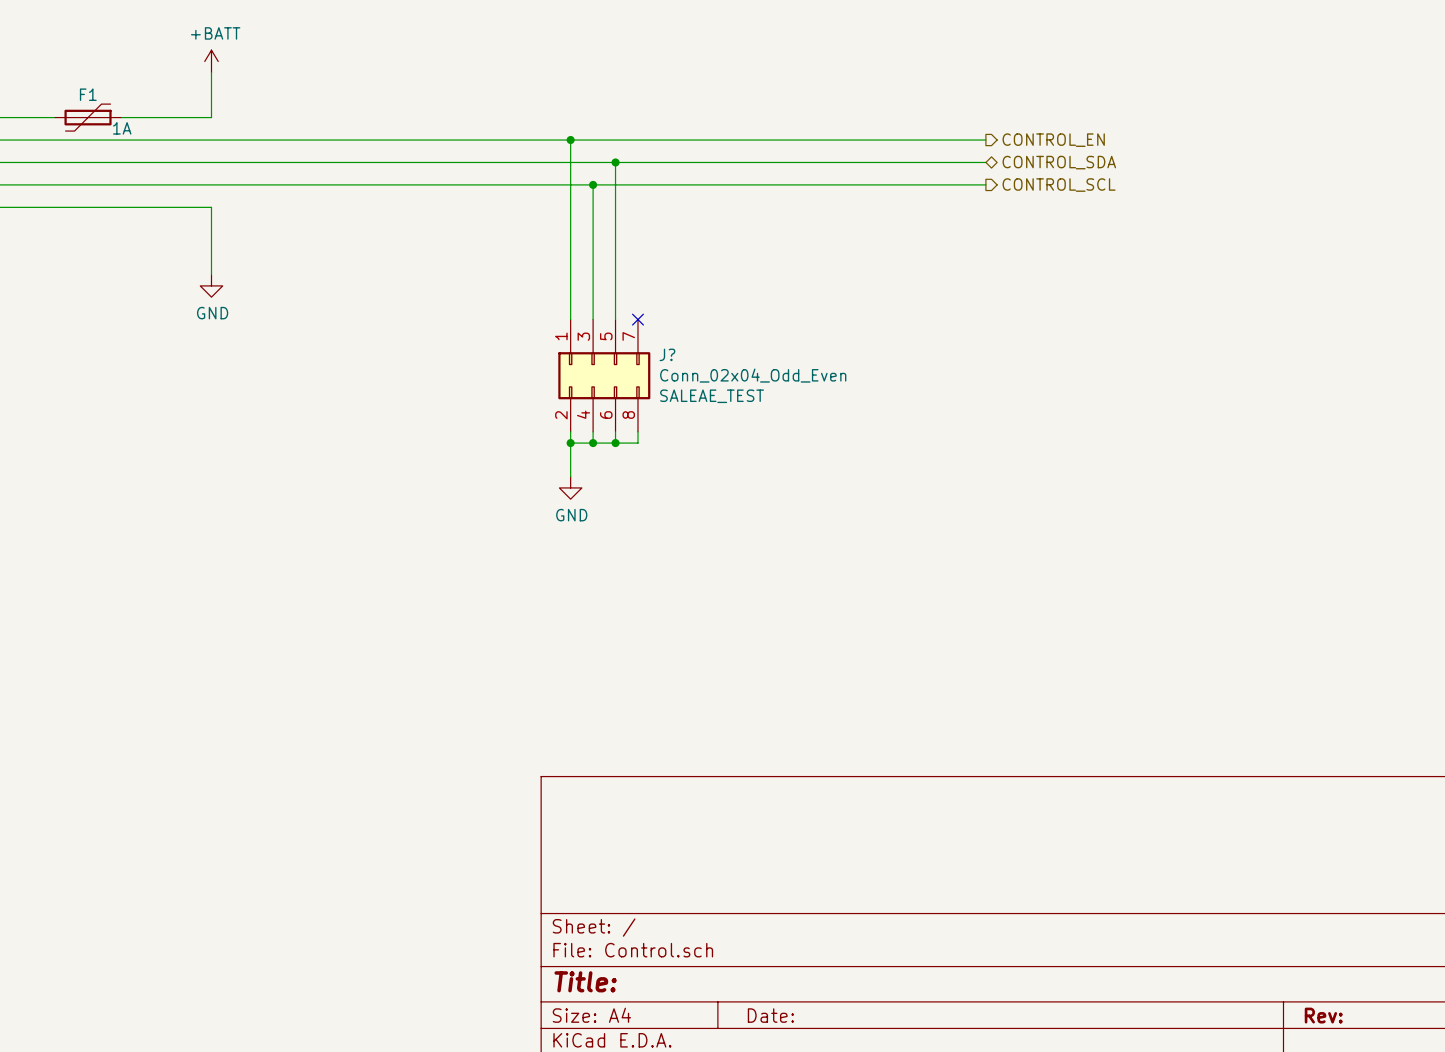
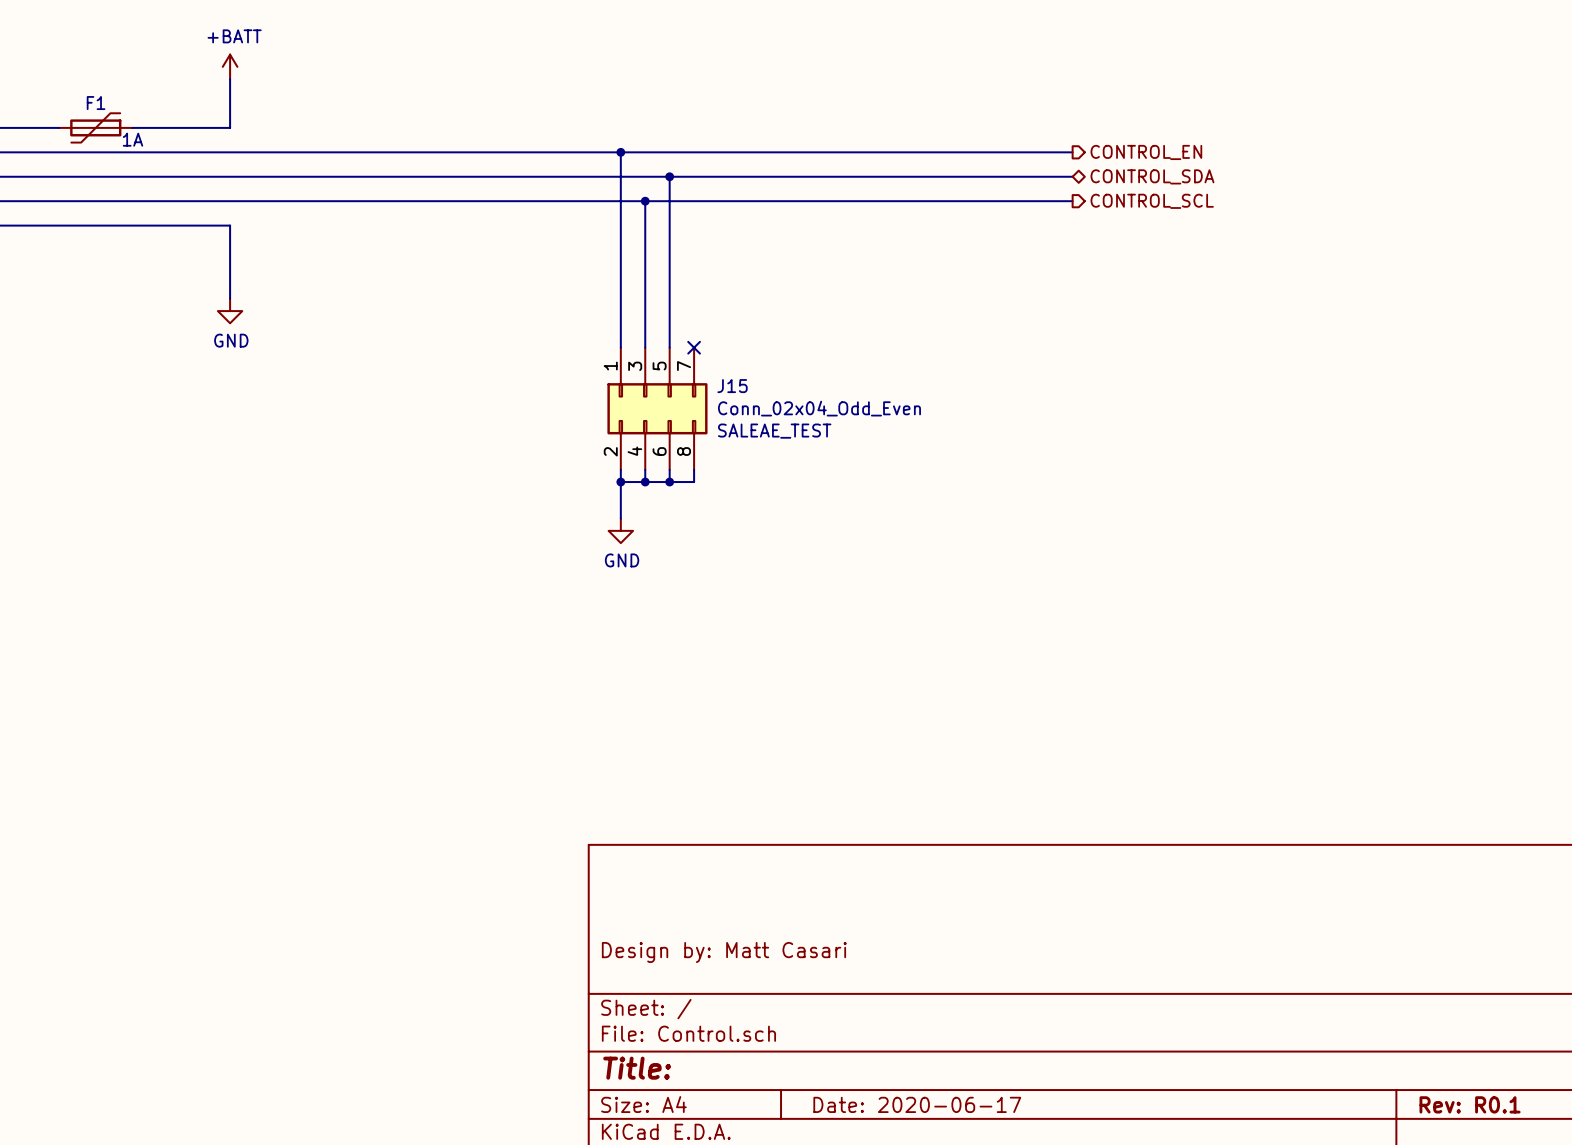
J? name: J? (667, 354) -> J15 (732, 386)
title block: none -> Design by: Matt Casari (724, 952)
title block: Date: (770, 1015) -> Date: 2020-06-17 (917, 1104)
title block: Rev: (1323, 1015) -> Rev: R0.1 (1470, 1104)

